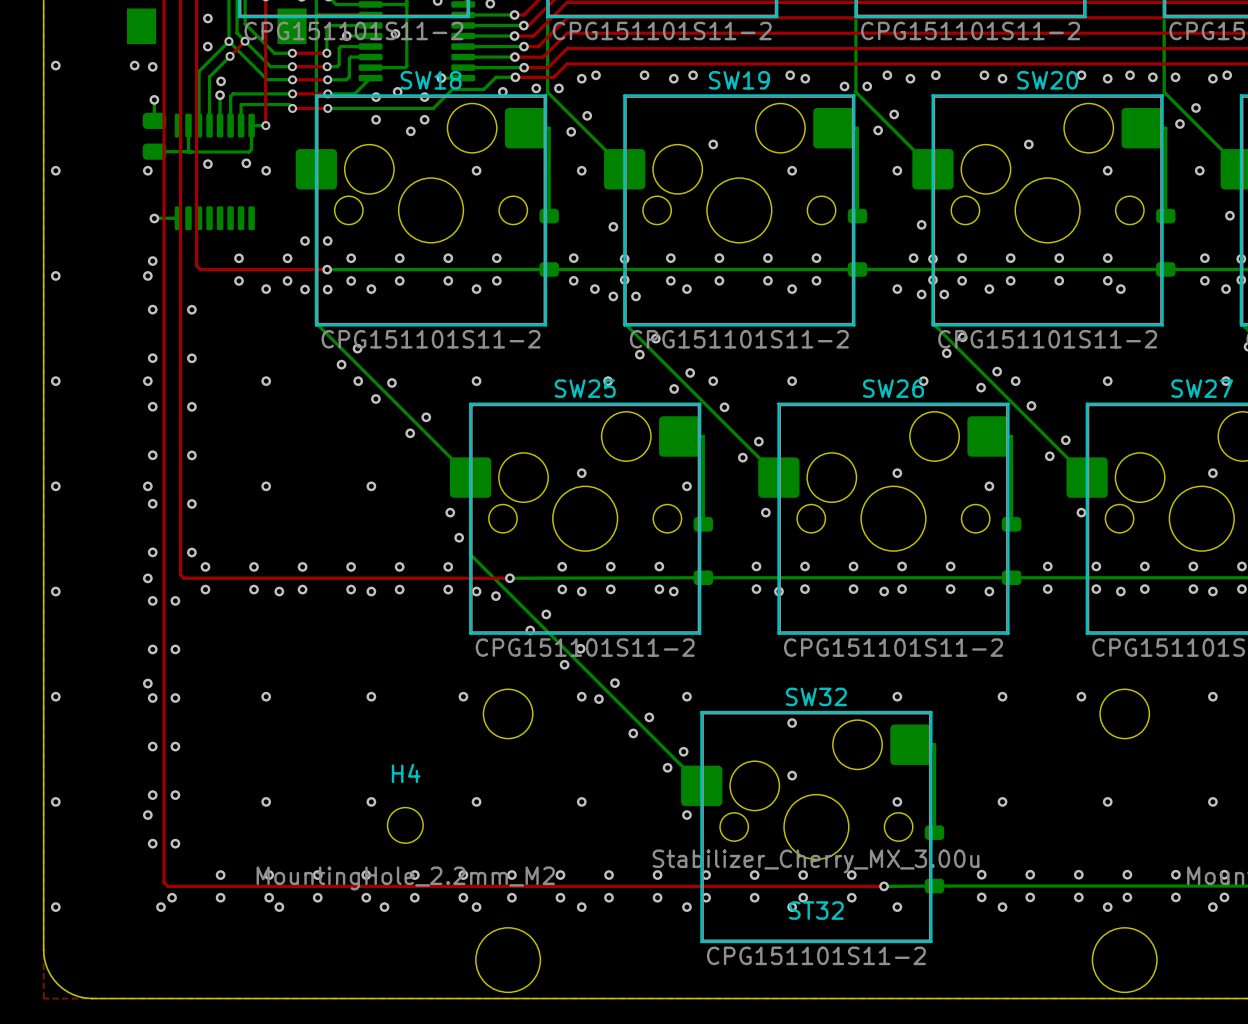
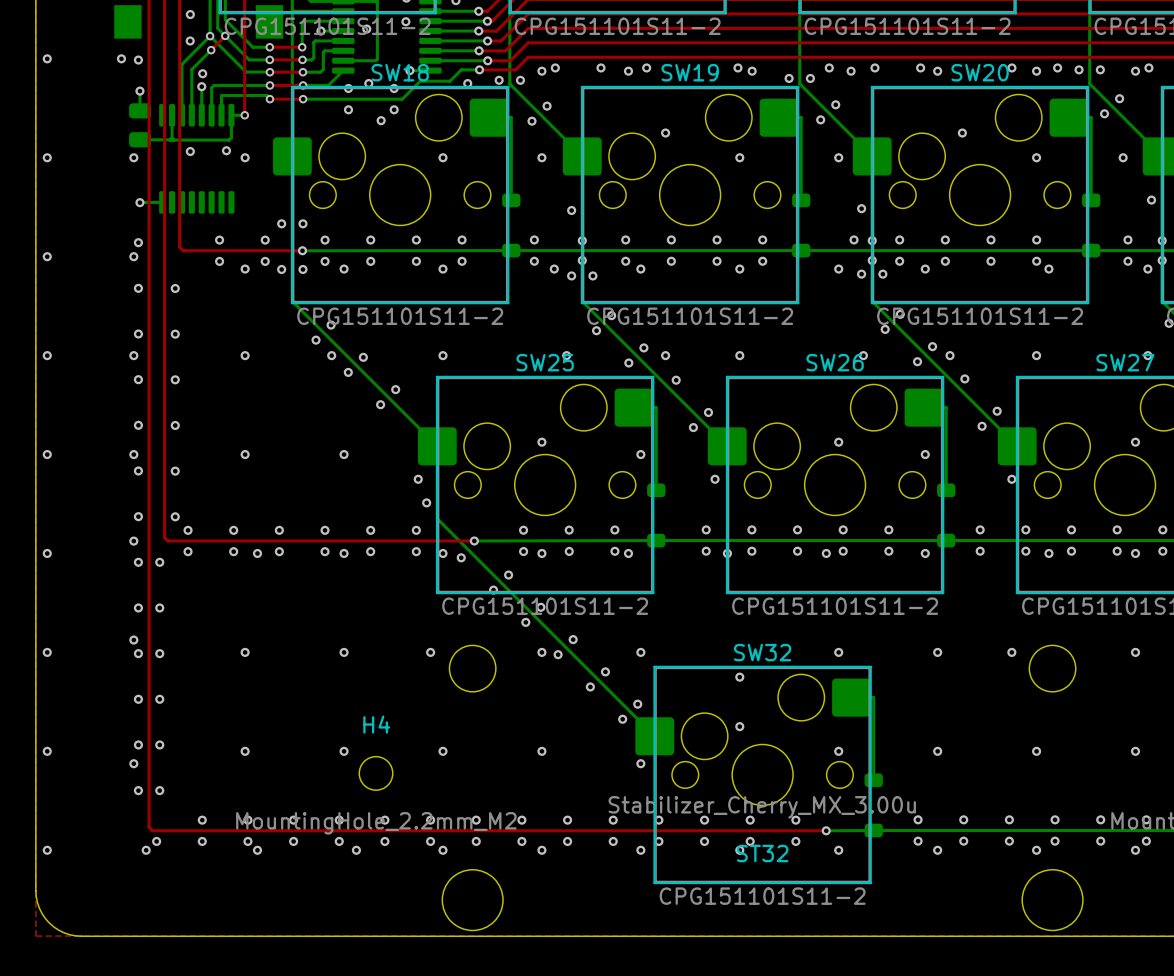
via: none -> (405, 21)

